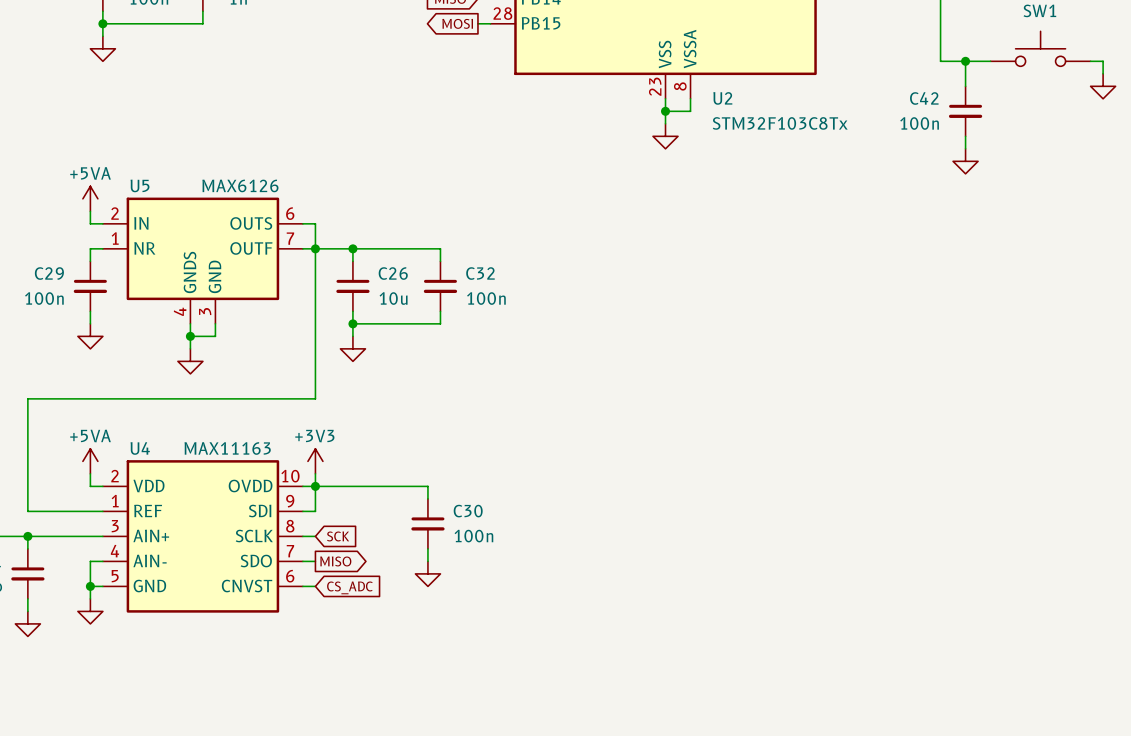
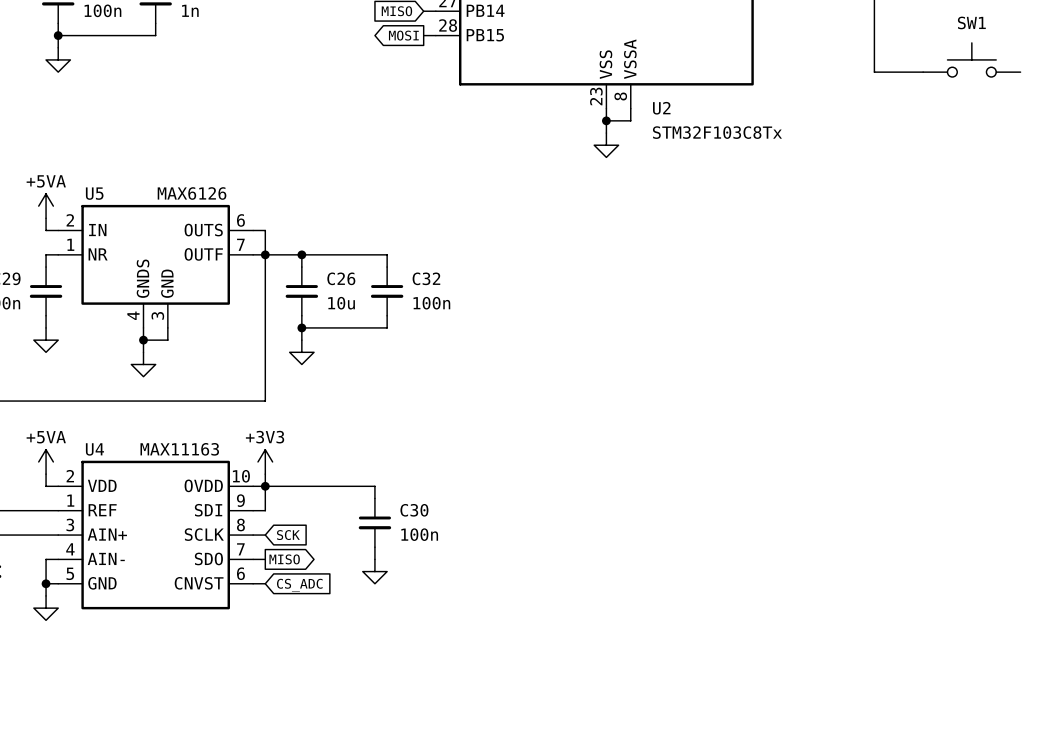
wire: (965, 61) (965, 86) -> none
junction: (965, 61) -> none
wire: (1090, 61) (1103, 61) (1103, 73) -> none
power symbol: (1103, 86) -> none
C42: 100n (965, 111) -> none
wire: (965, 136) (965, 148) -> none
power symbol: (965, 161) -> none

